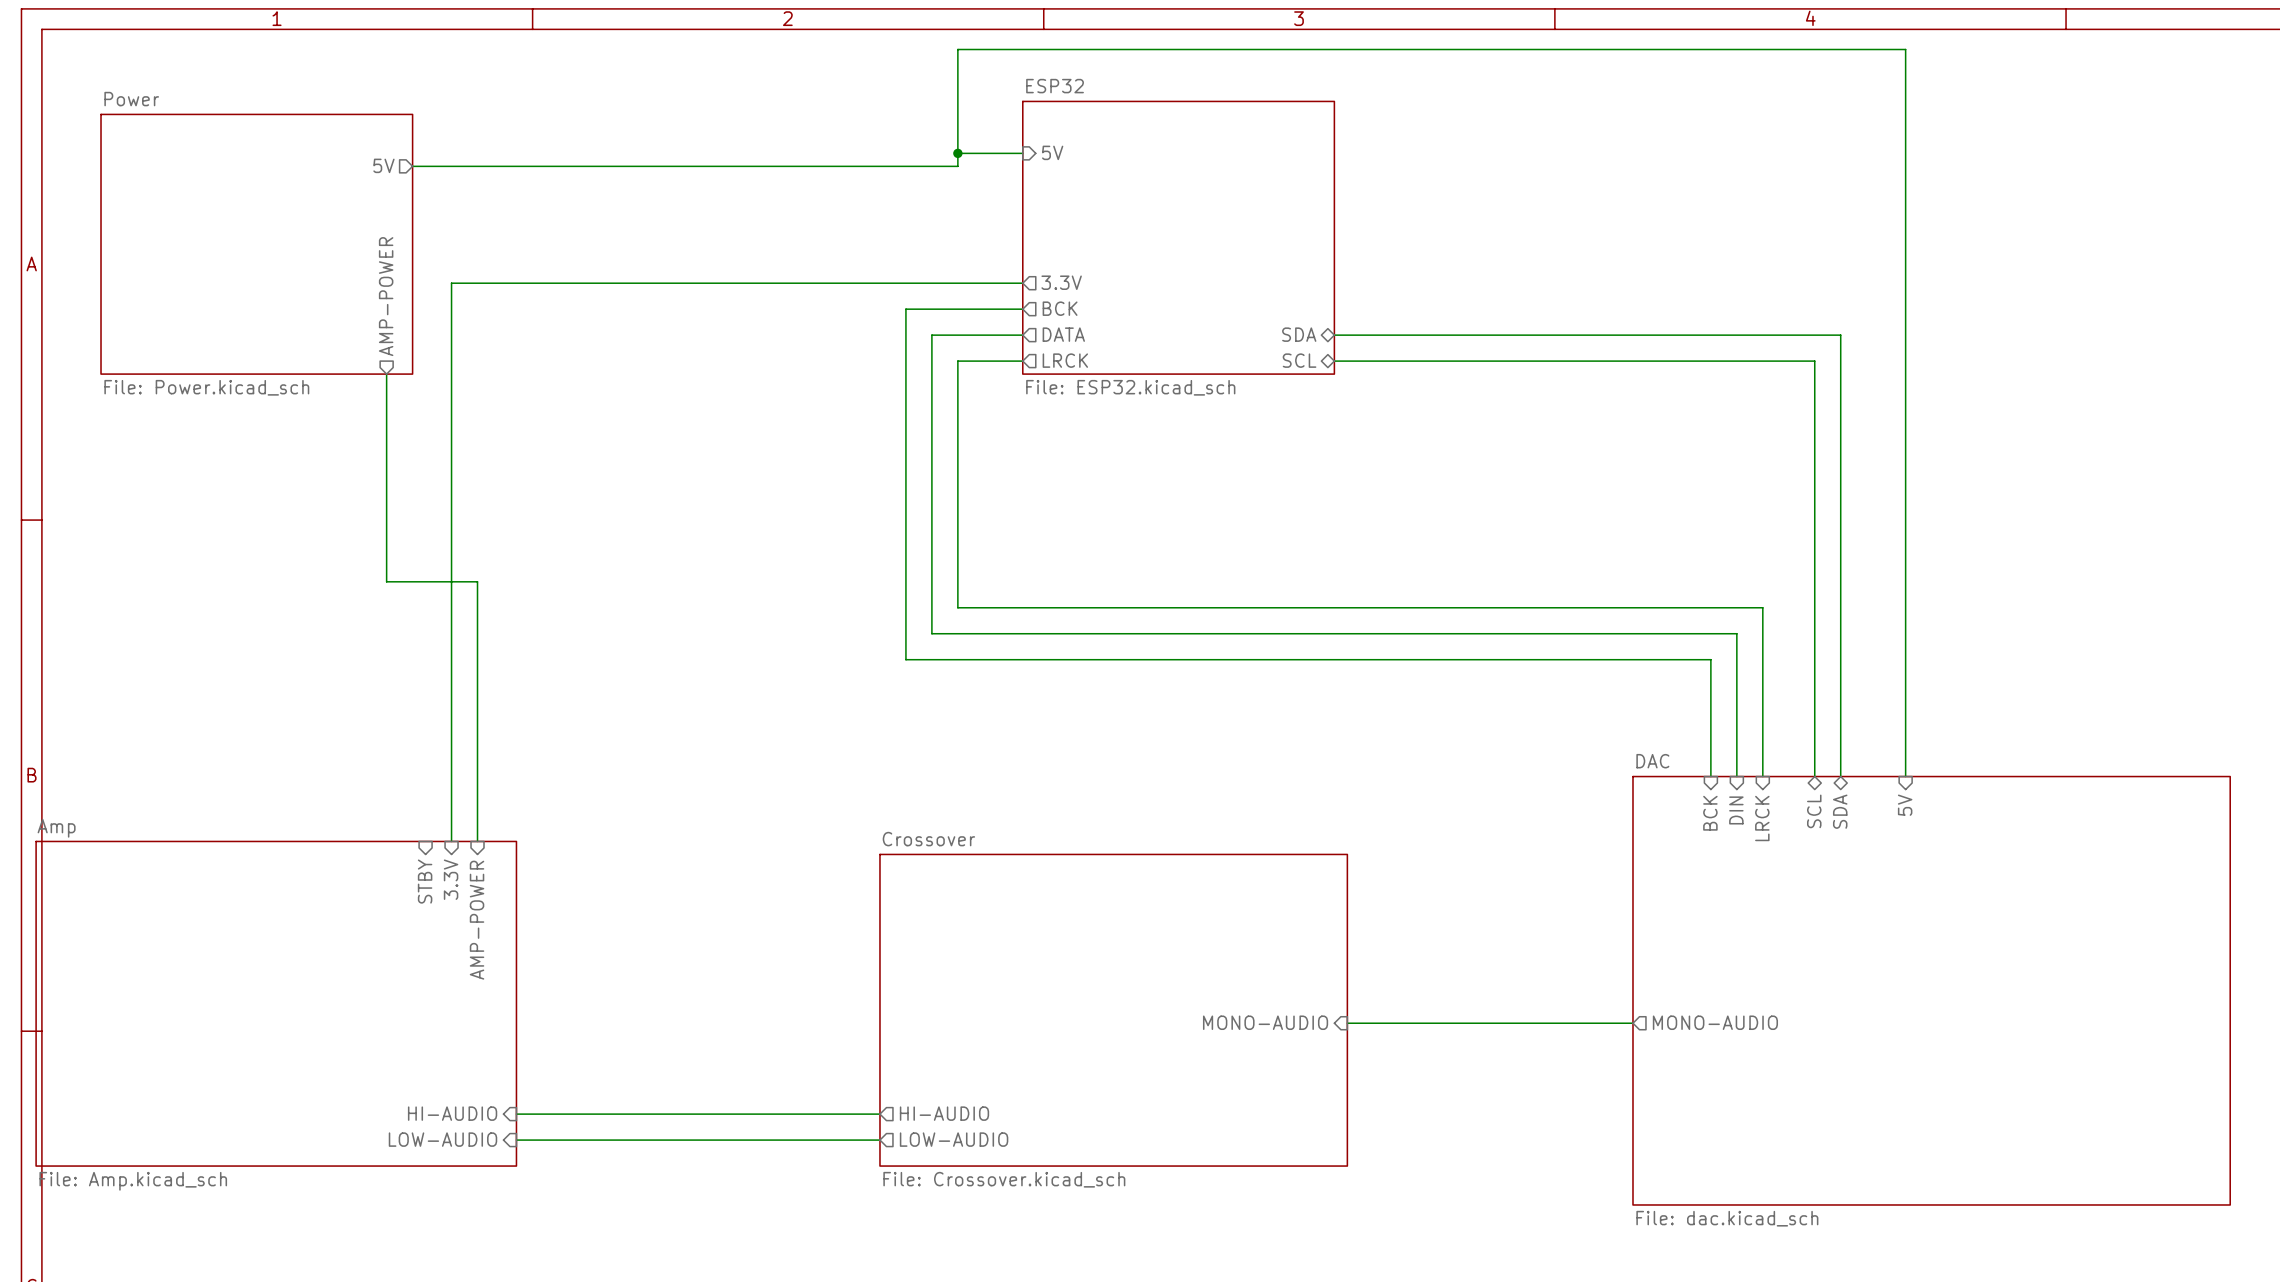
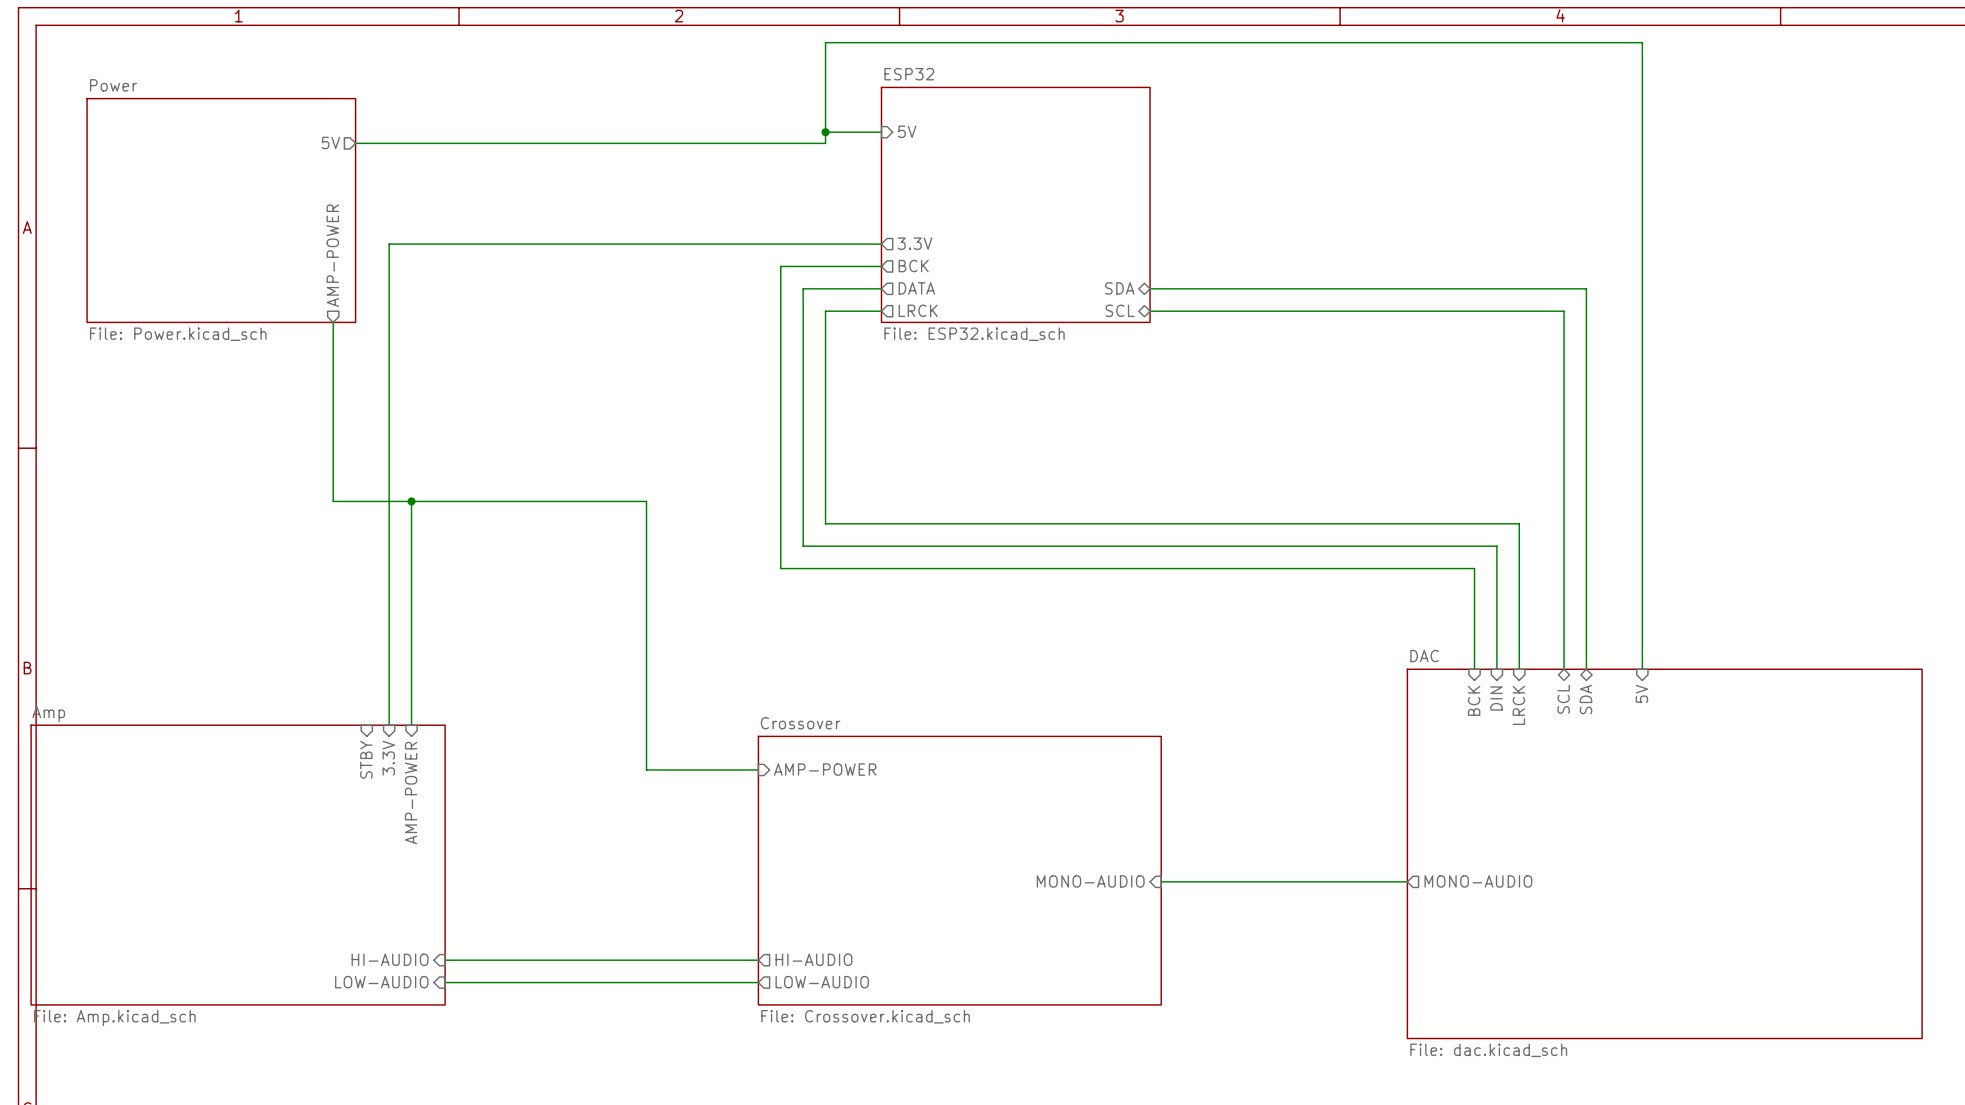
wire: none -> (411, 501) (646, 501) (646, 769) (758, 769)
junction: none -> (411, 501)
sheet pin: none -> AMP-POWER (825, 769)

